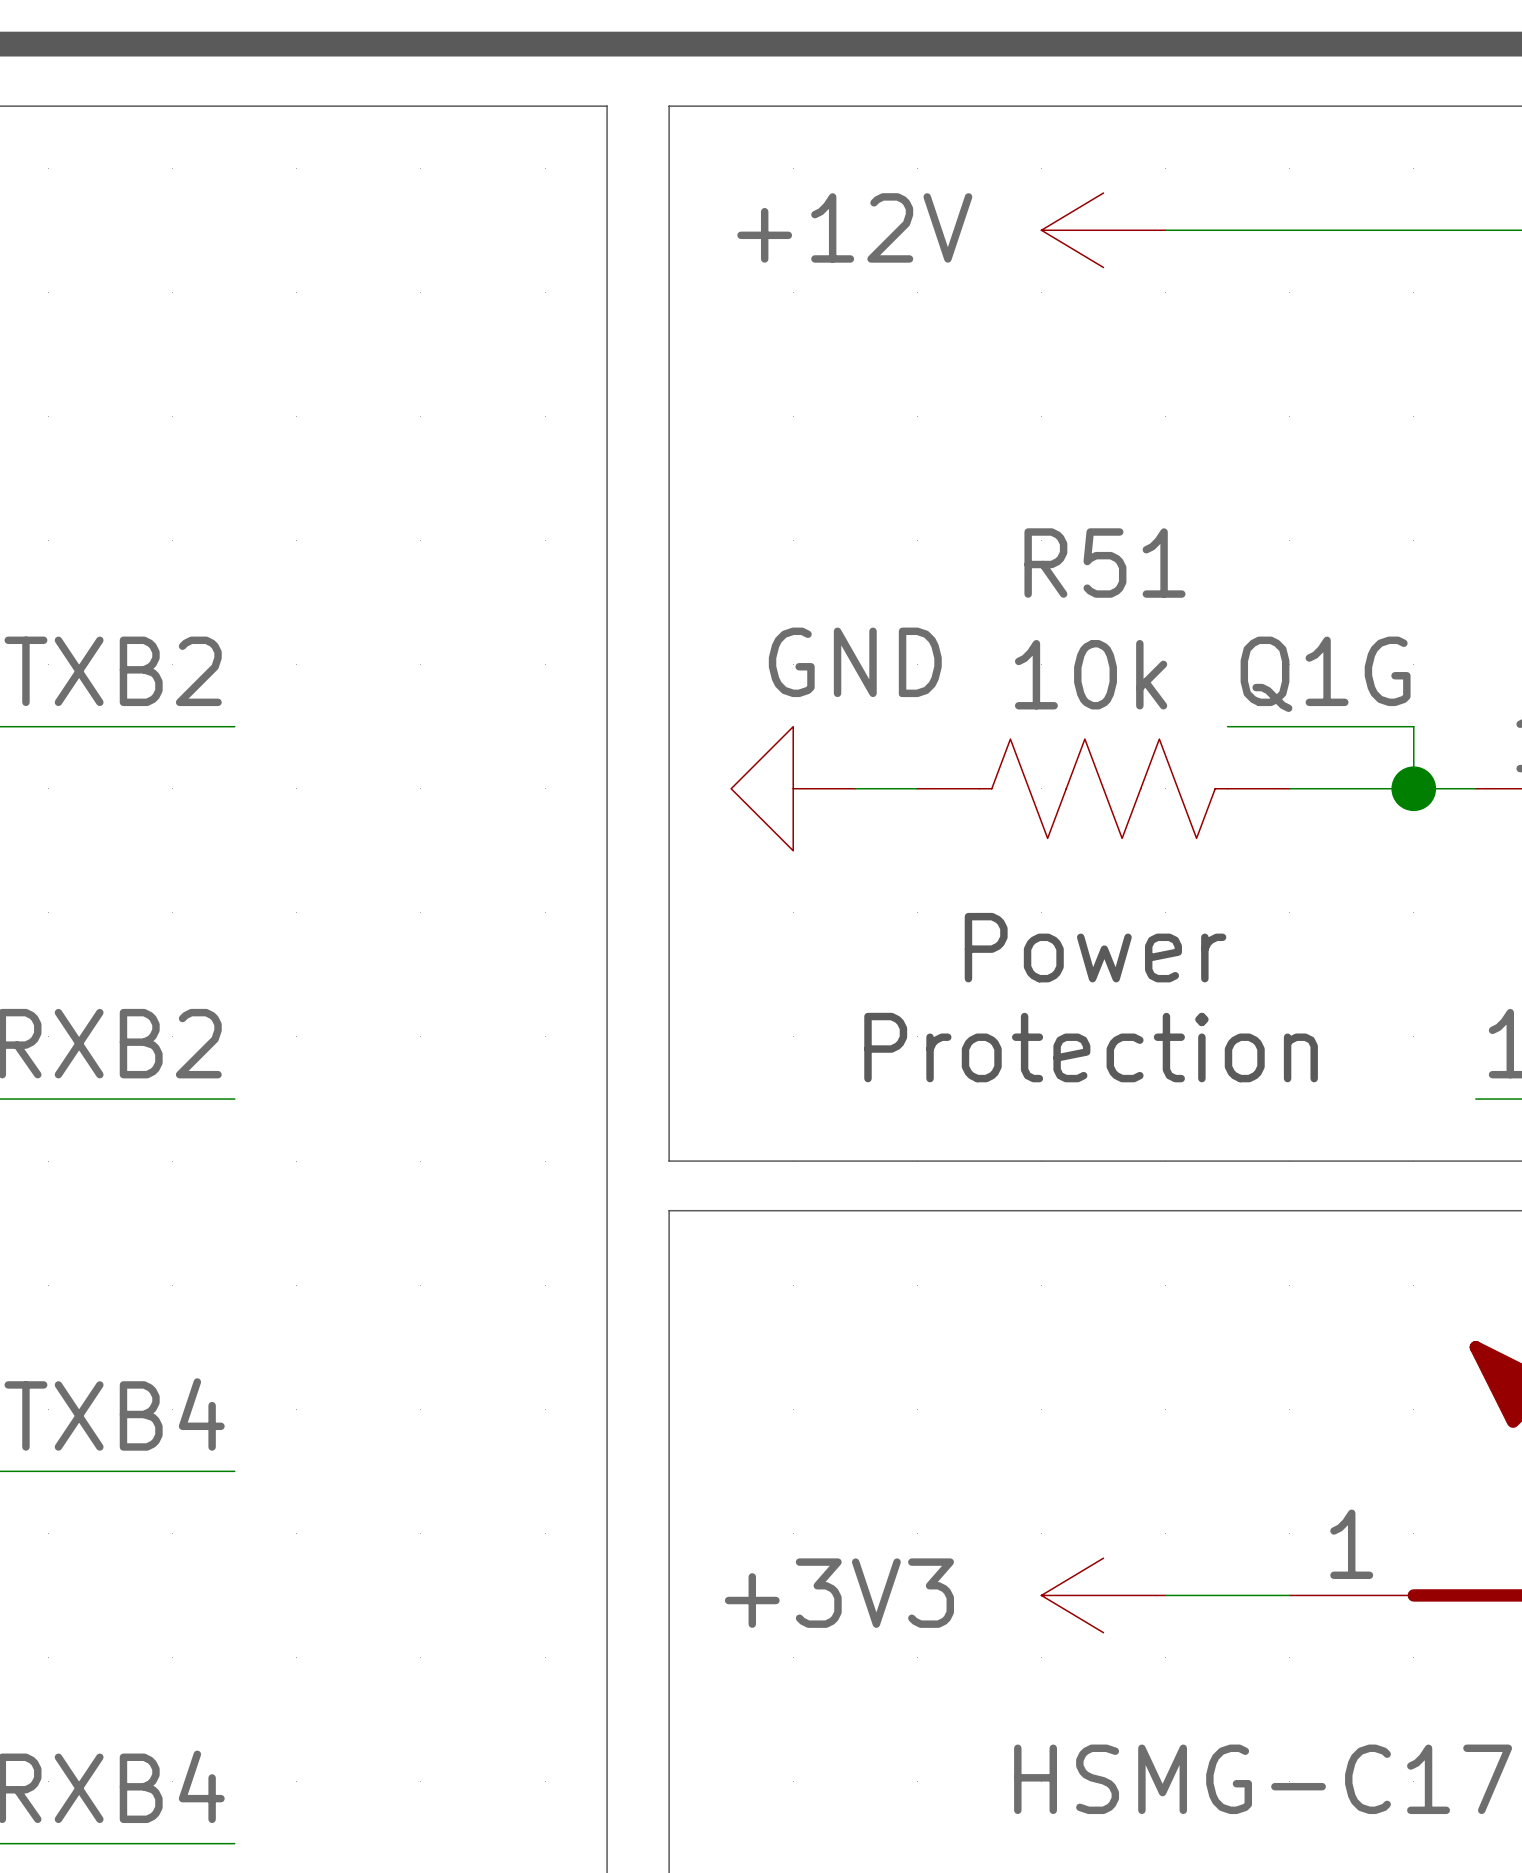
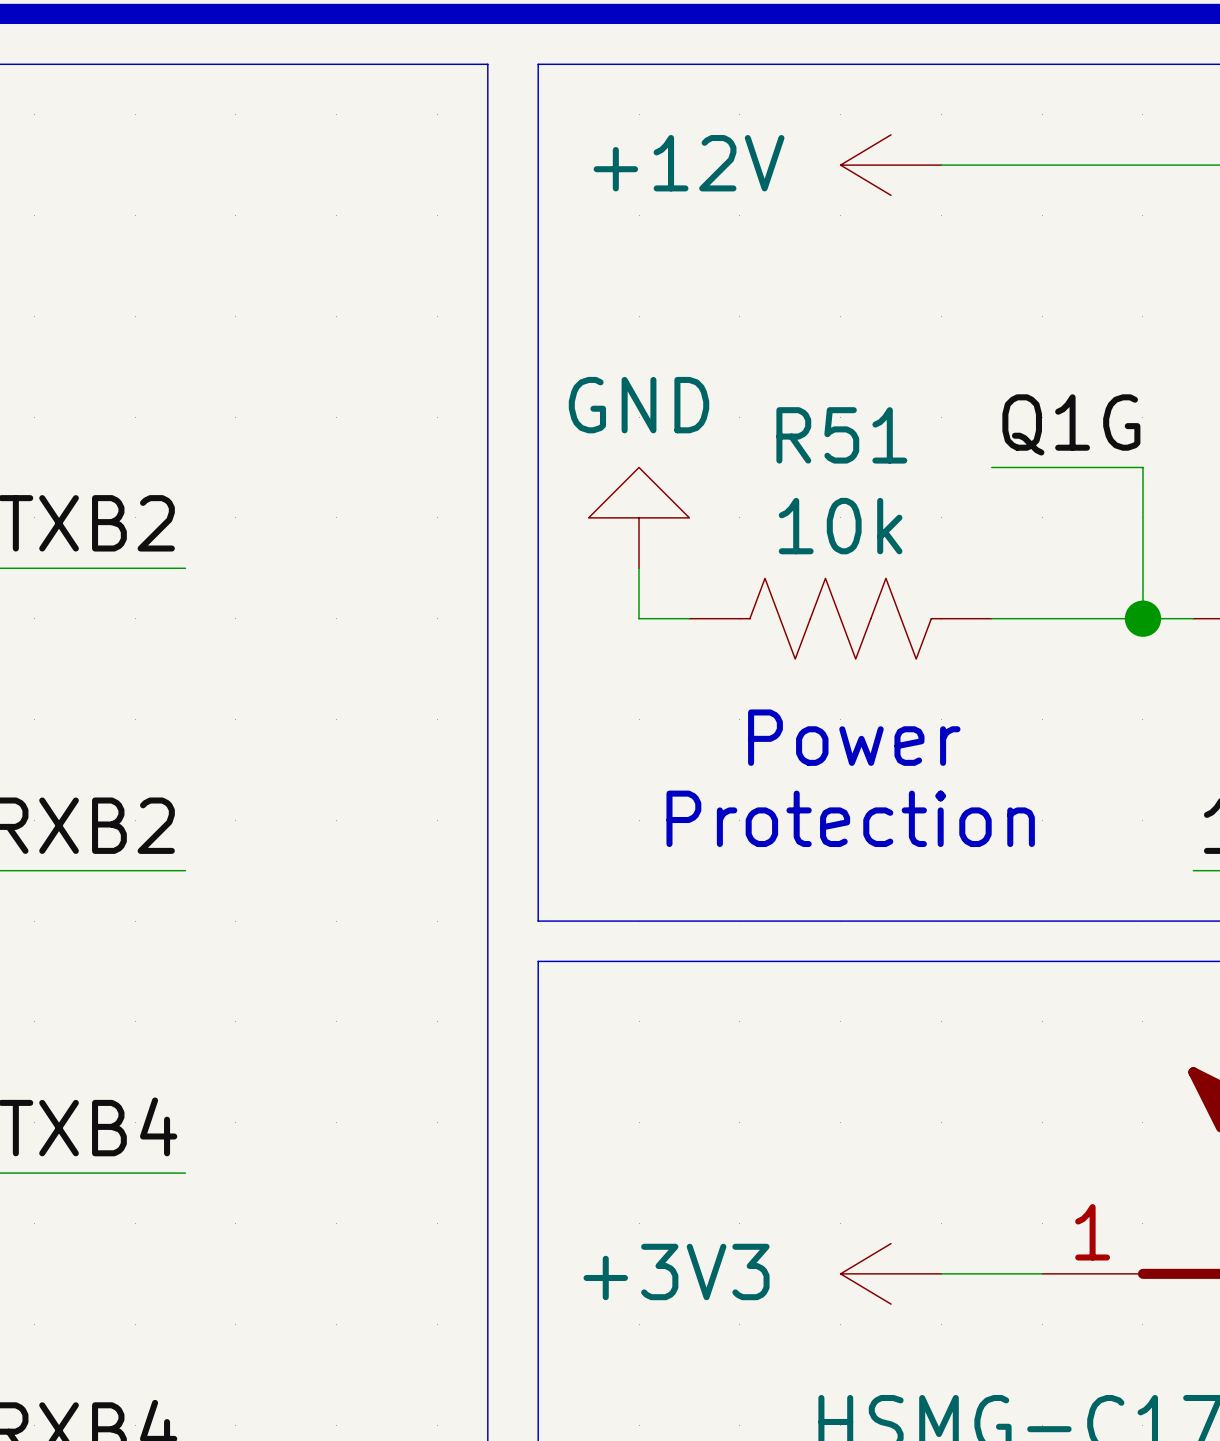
R51 value position: 10k (1091, 674) -> 10k (840, 526)
label position: Q1G (1325, 674) -> Q1G (1071, 424)
wire: (1227, 726) (1413, 726) -> (991, 467) (1142, 467) (1142, 568)
power symbol rotation: 0° (793, 788) -> 90° clockwise (639, 517)
power symbol position: GND (793, 788) -> GND (639, 517)
R51 position: (1103, 788) -> (840, 618)
text position: Power (1095, 947) -> Power (854, 737)
text position: Protection (1091, 1047) -> Protection (850, 818)

